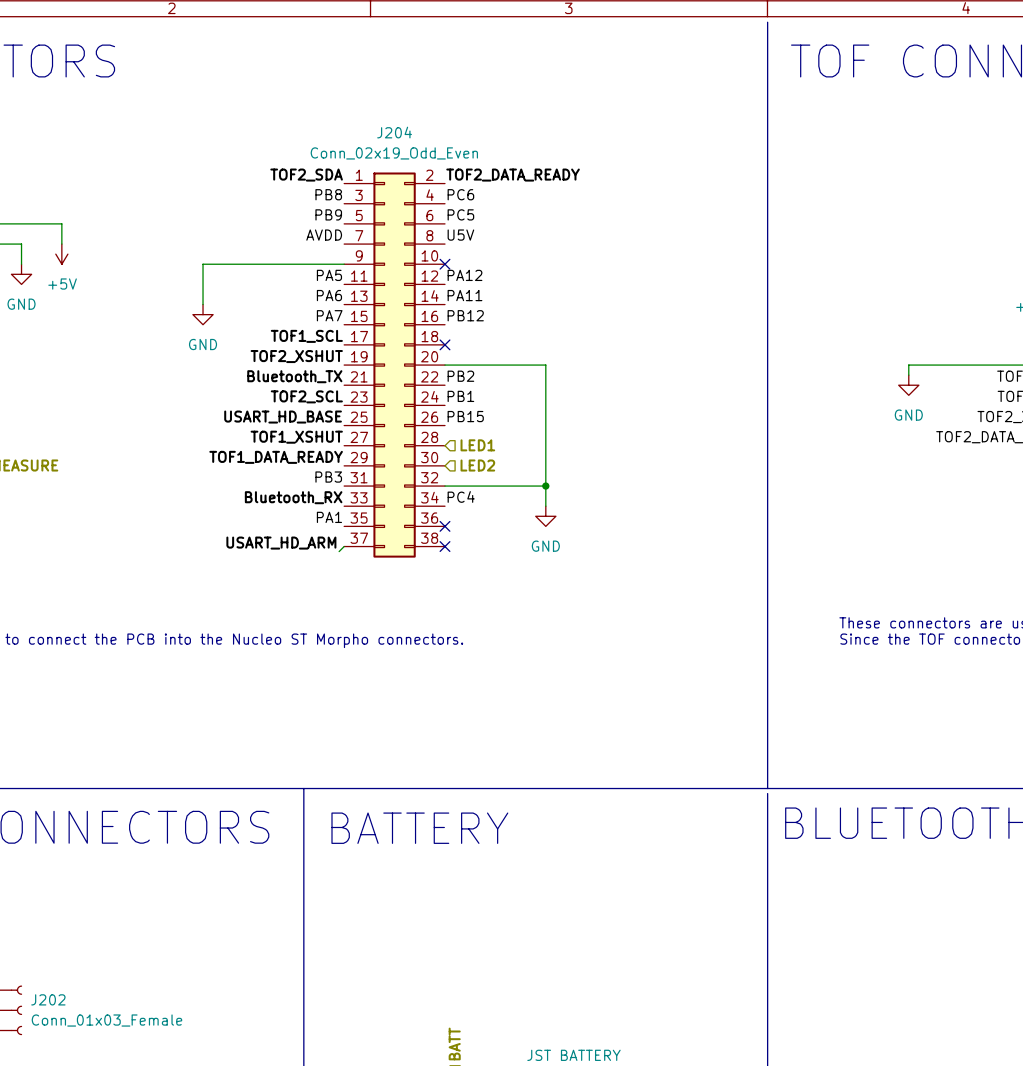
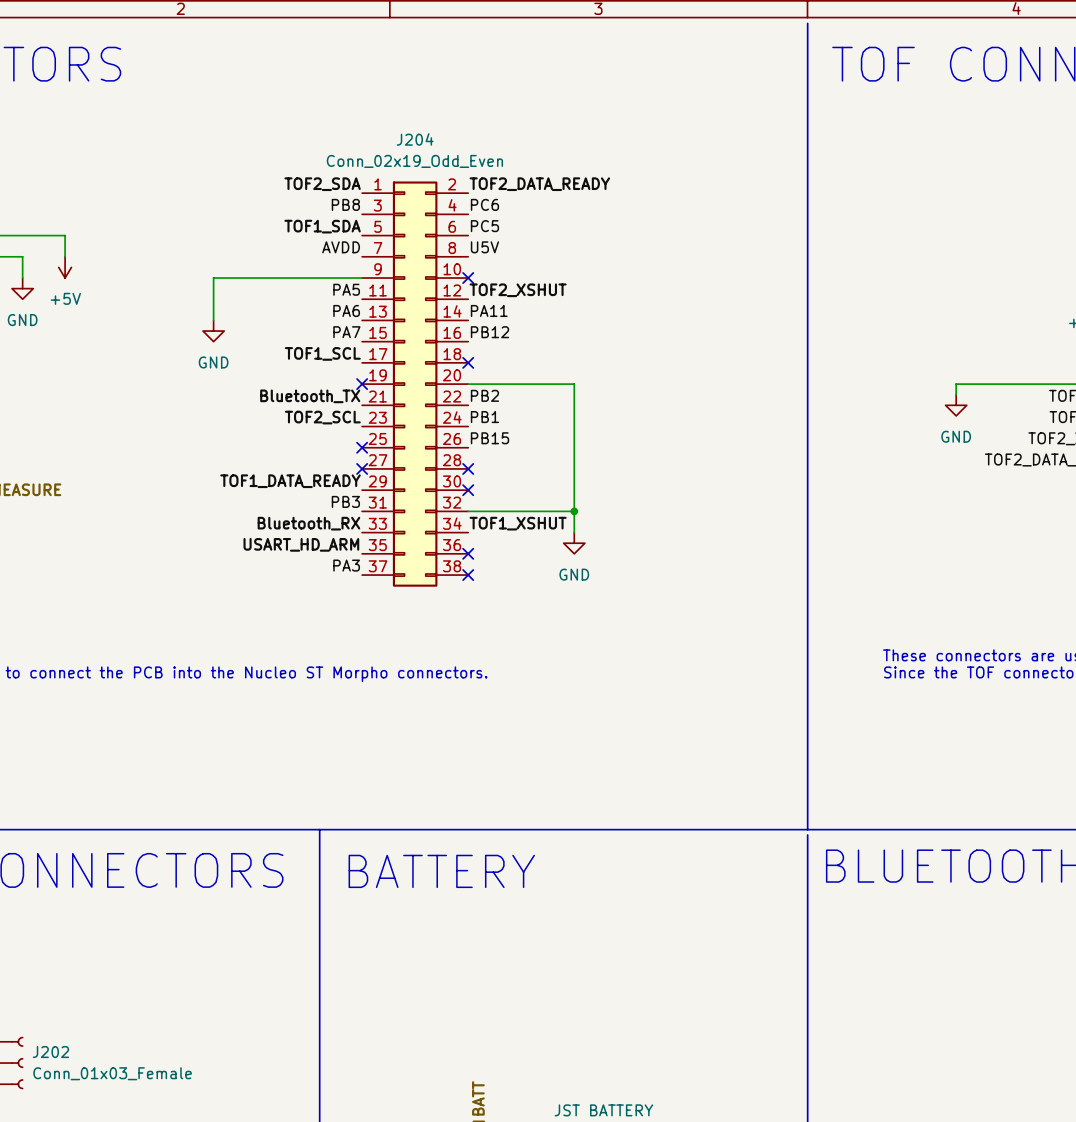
label: PB9 (328, 214) -> TOF1_SDA (322, 226)
label: PA12 (464, 275) -> TOF2_XSHUT (518, 290)
label: TOF2_XSHUT (296, 356) -> none
no-connect mark: none -> (362, 384)
label: USART_HD_BASE (283, 417) -> none
no-connect mark: none -> (362, 447)
label: TOF1_XSHUT (296, 437) -> none
no-connect mark: none -> (362, 468)
no-connect mark: none -> (468, 468)
hierarchical label: LED1 (477, 445) -> none
no-connect mark: none -> (468, 490)
hierarchical label: LED2 (477, 465) -> none
label: PC4 (461, 496) -> TOF1_XSHUT (518, 523)
label: PA1 (329, 517) -> USART_HD_ARM (301, 544)
label: USART_HD_ARM (281, 543) -> PA3 (346, 565)
wire: (344, 546) (339, 551) -> none

